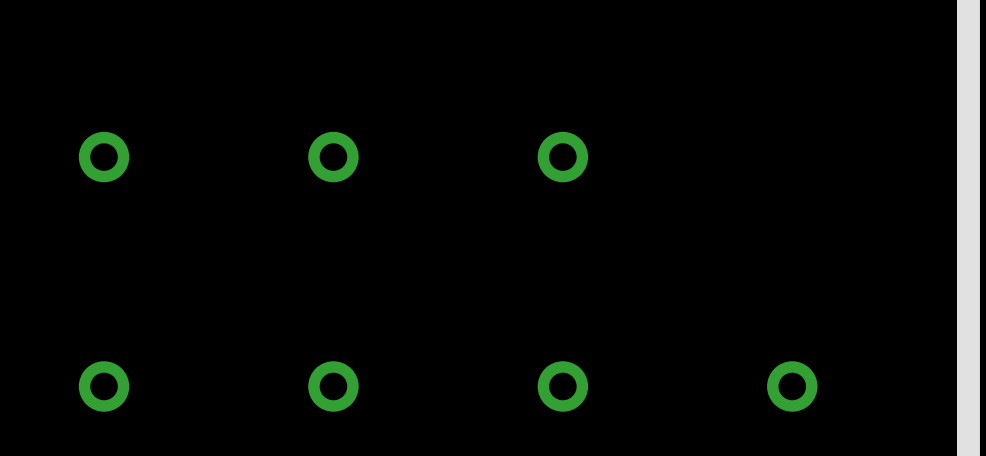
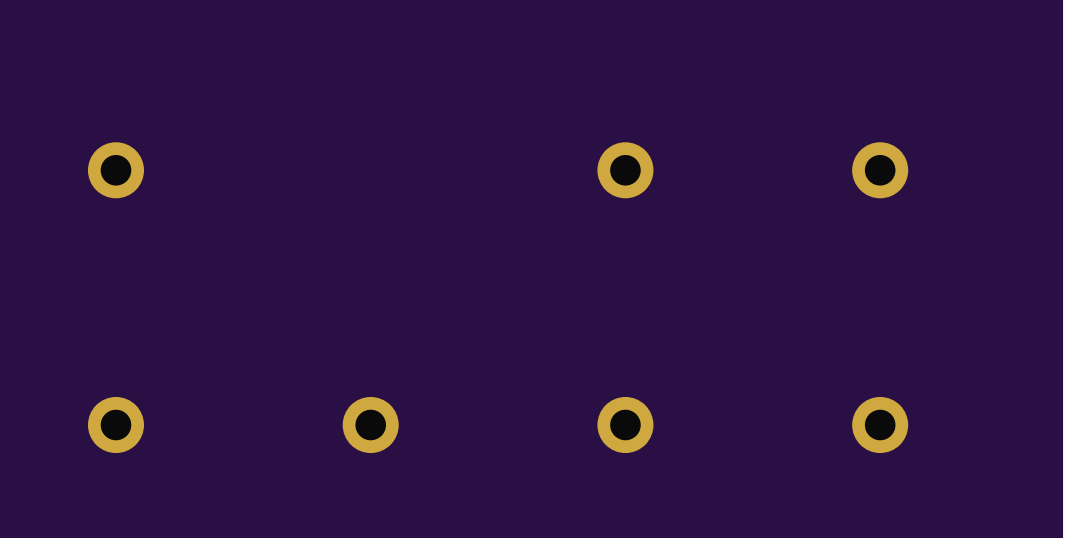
via: (333, 157) -> none
via: none -> (880, 170)

